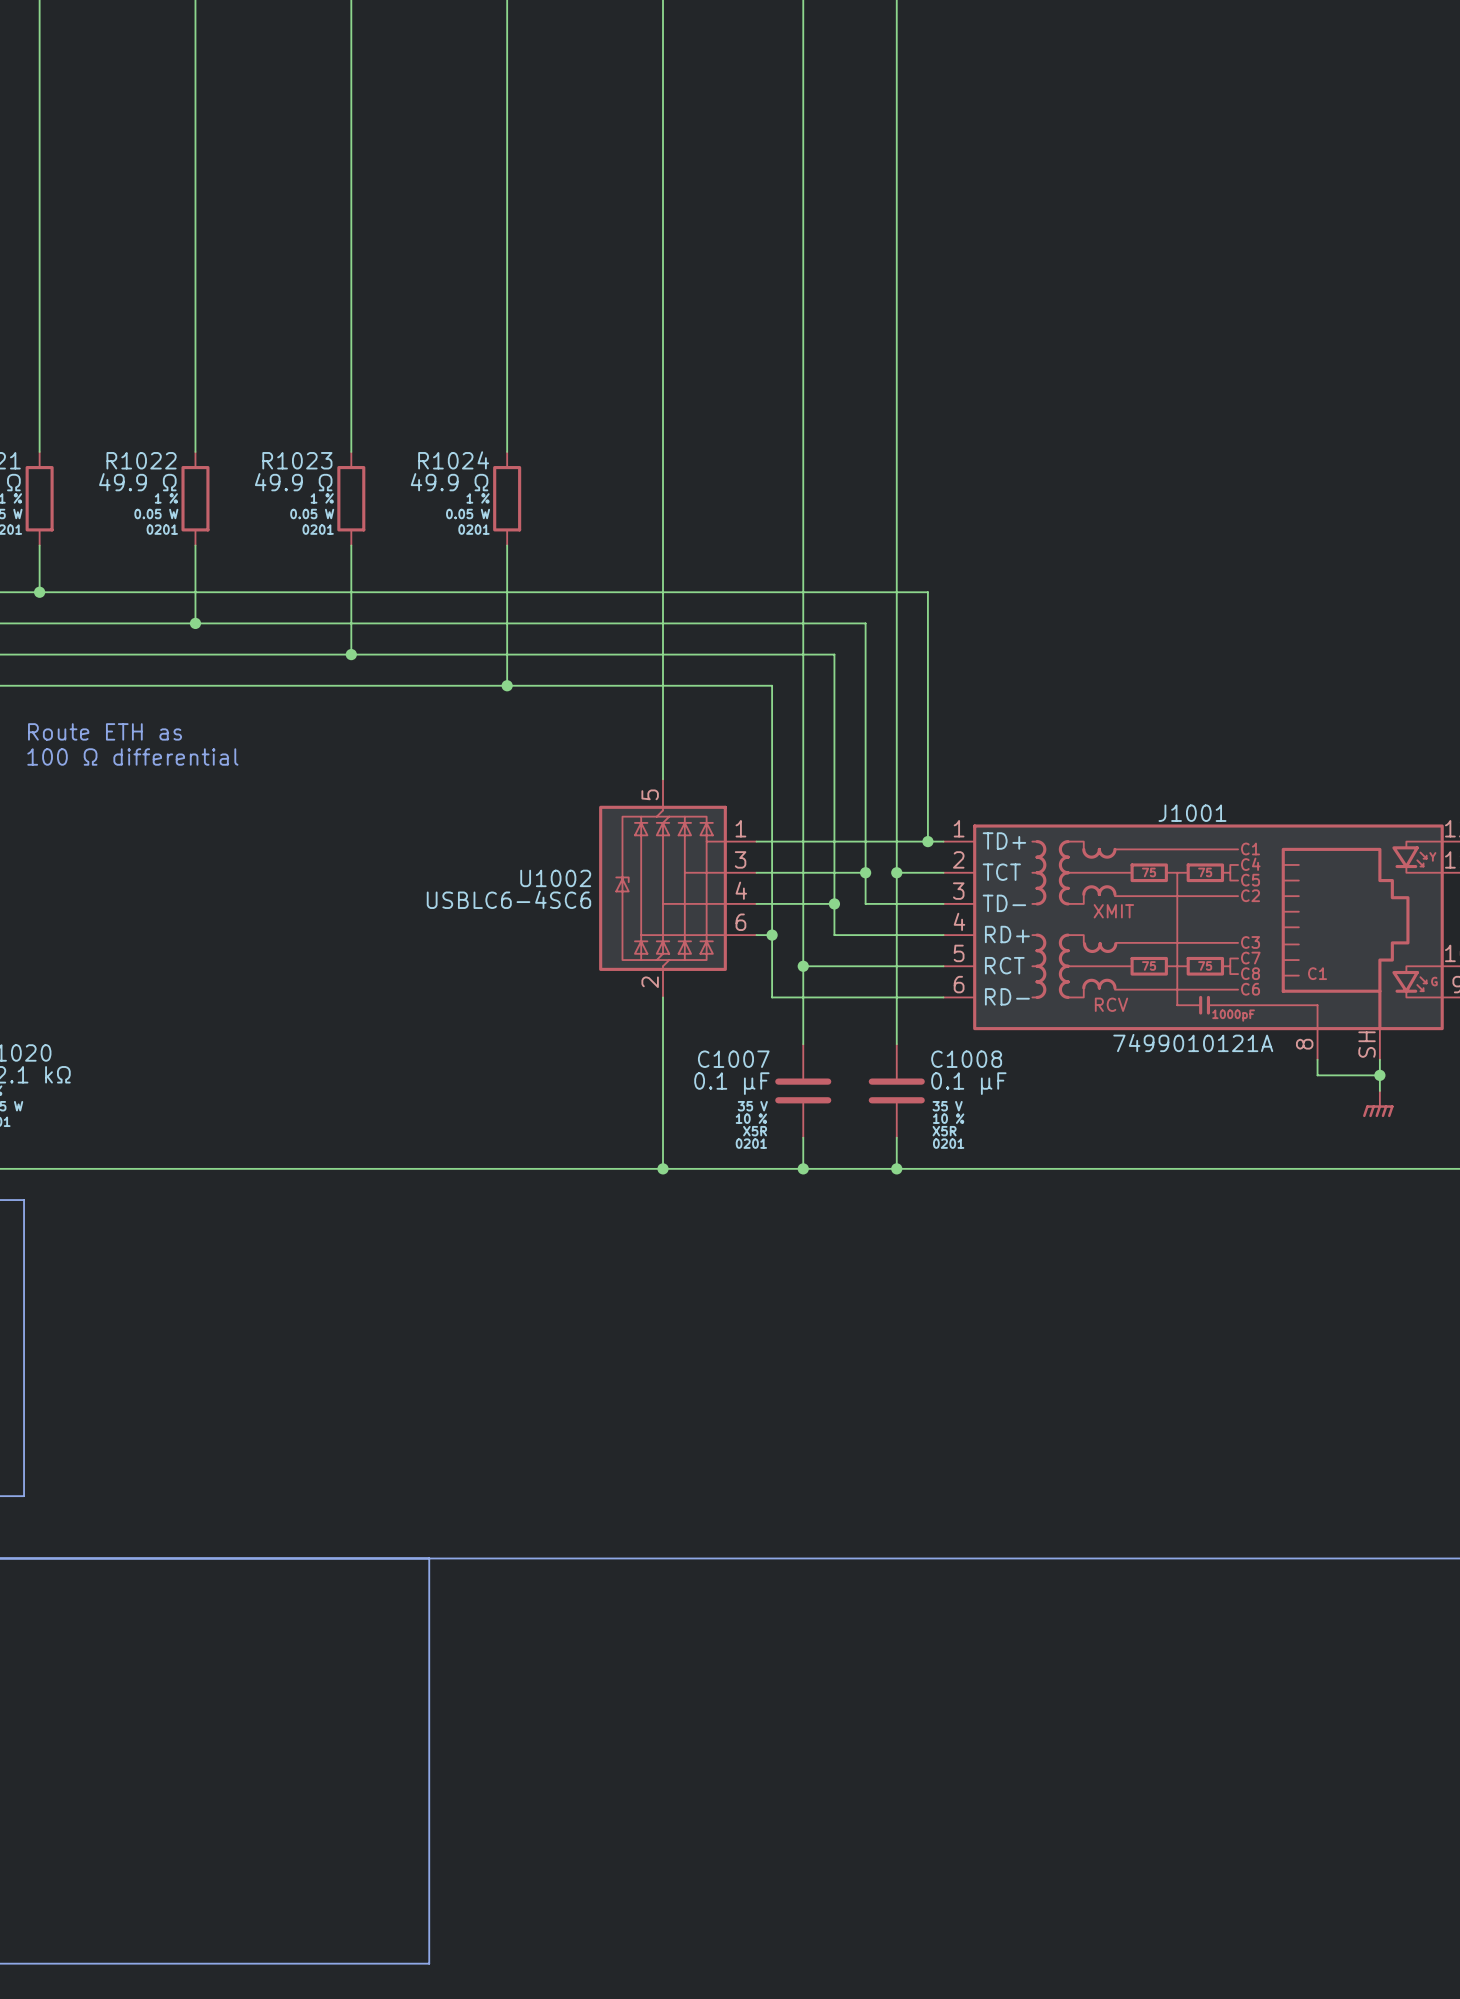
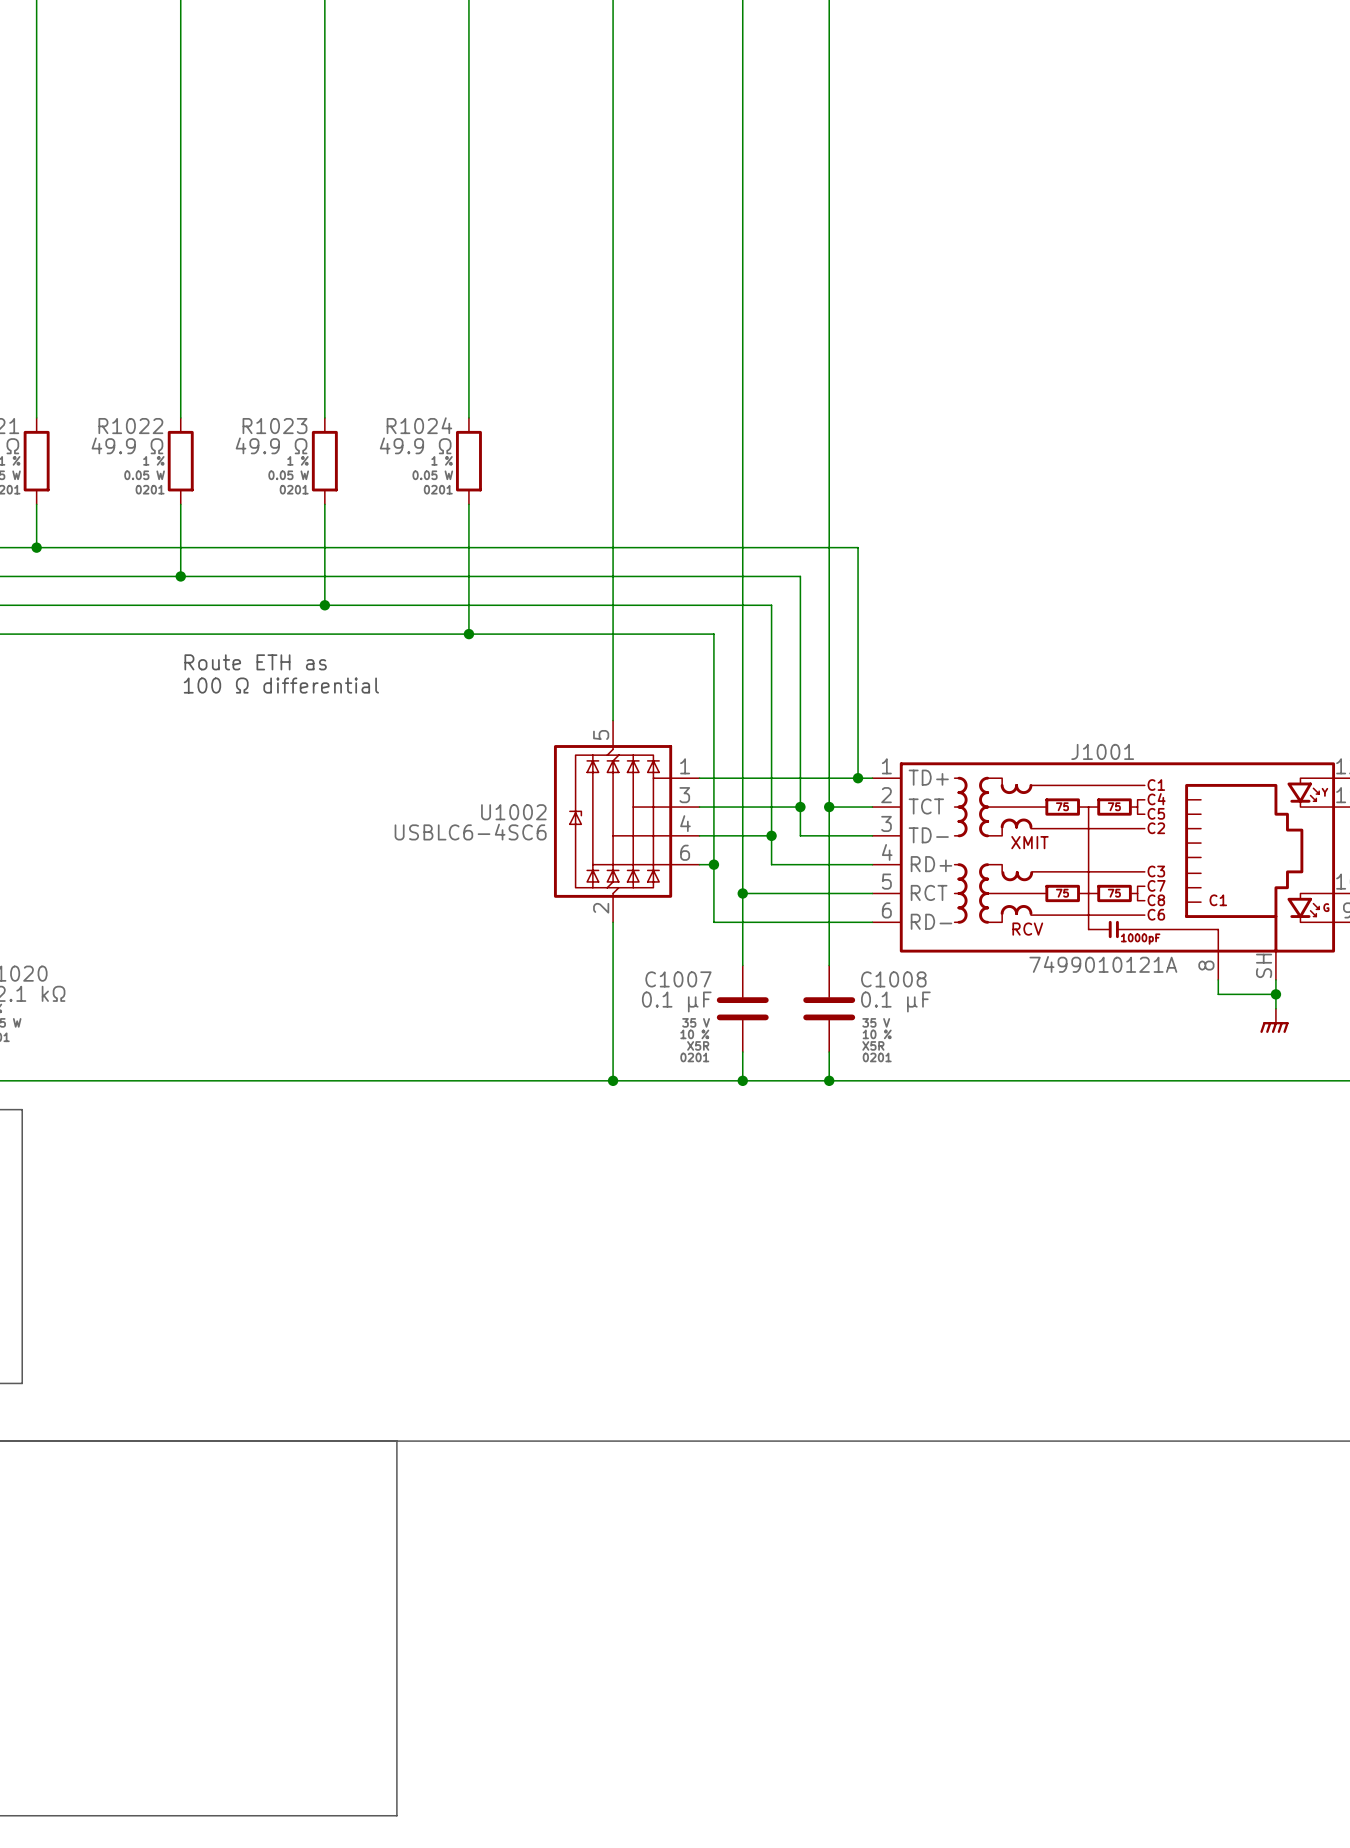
text position: Route ETH as (105, 731) -> Route ETH as (255, 662)
text position: 100 Ω differential (132, 756) -> 100 Ω differential (281, 685)

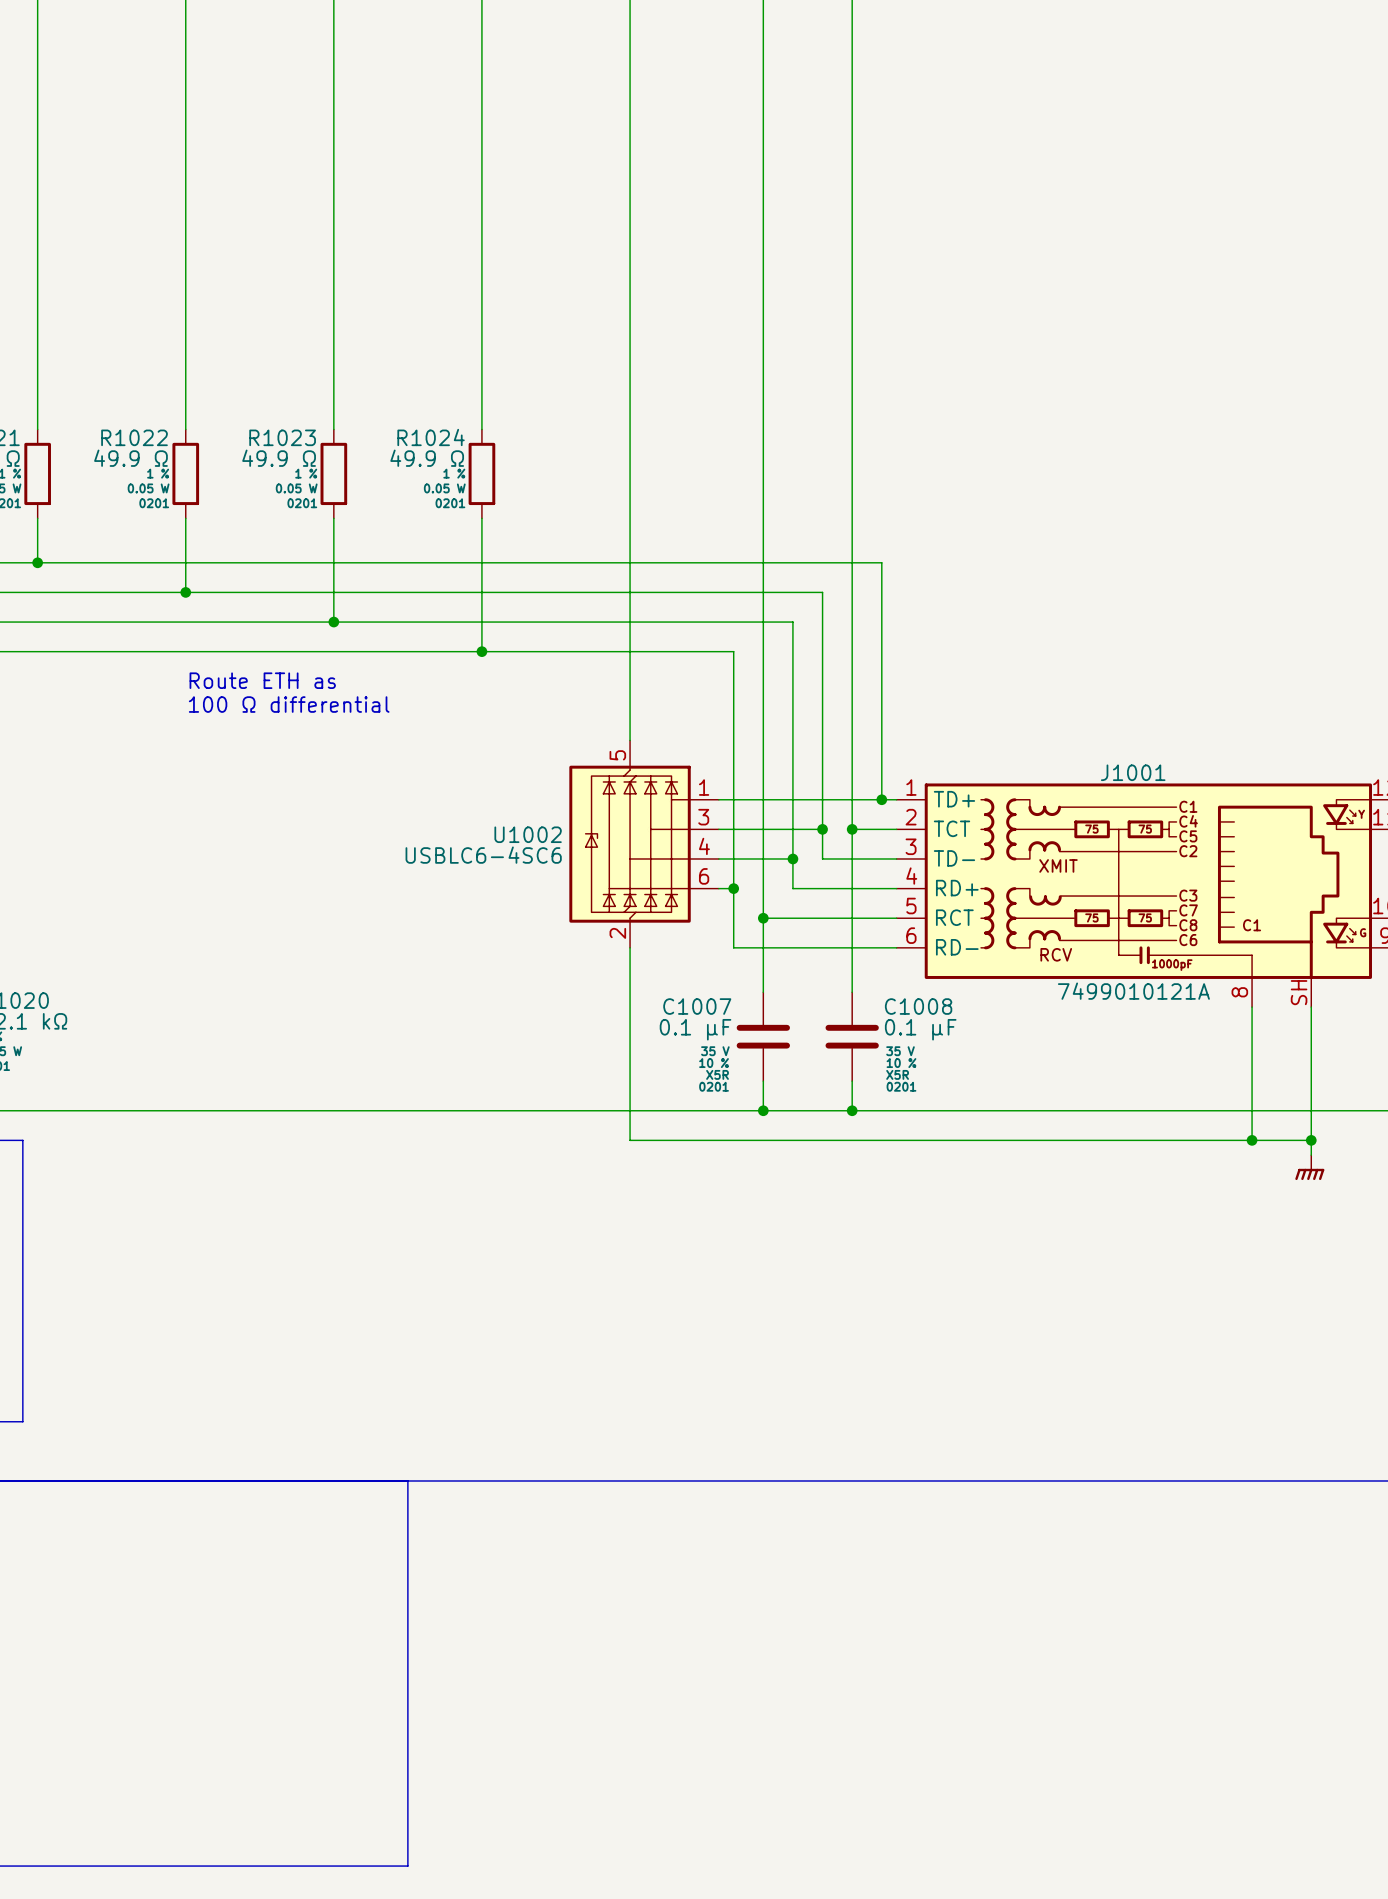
wire: (1218, 994) (1275, 994) -> (1252, 1021) (1252, 1140)
junction: (1275, 994) -> none
wire: none -> (1311, 1036) (1311, 1155)
power symbol position: (1274, 1020) -> (1309, 1167)
wire: none -> (630, 1110) (630, 1140) (1311, 1140)
junction: (613, 1080) -> none
junction: none -> (1252, 1140)
junction: none -> (1311, 1140)

